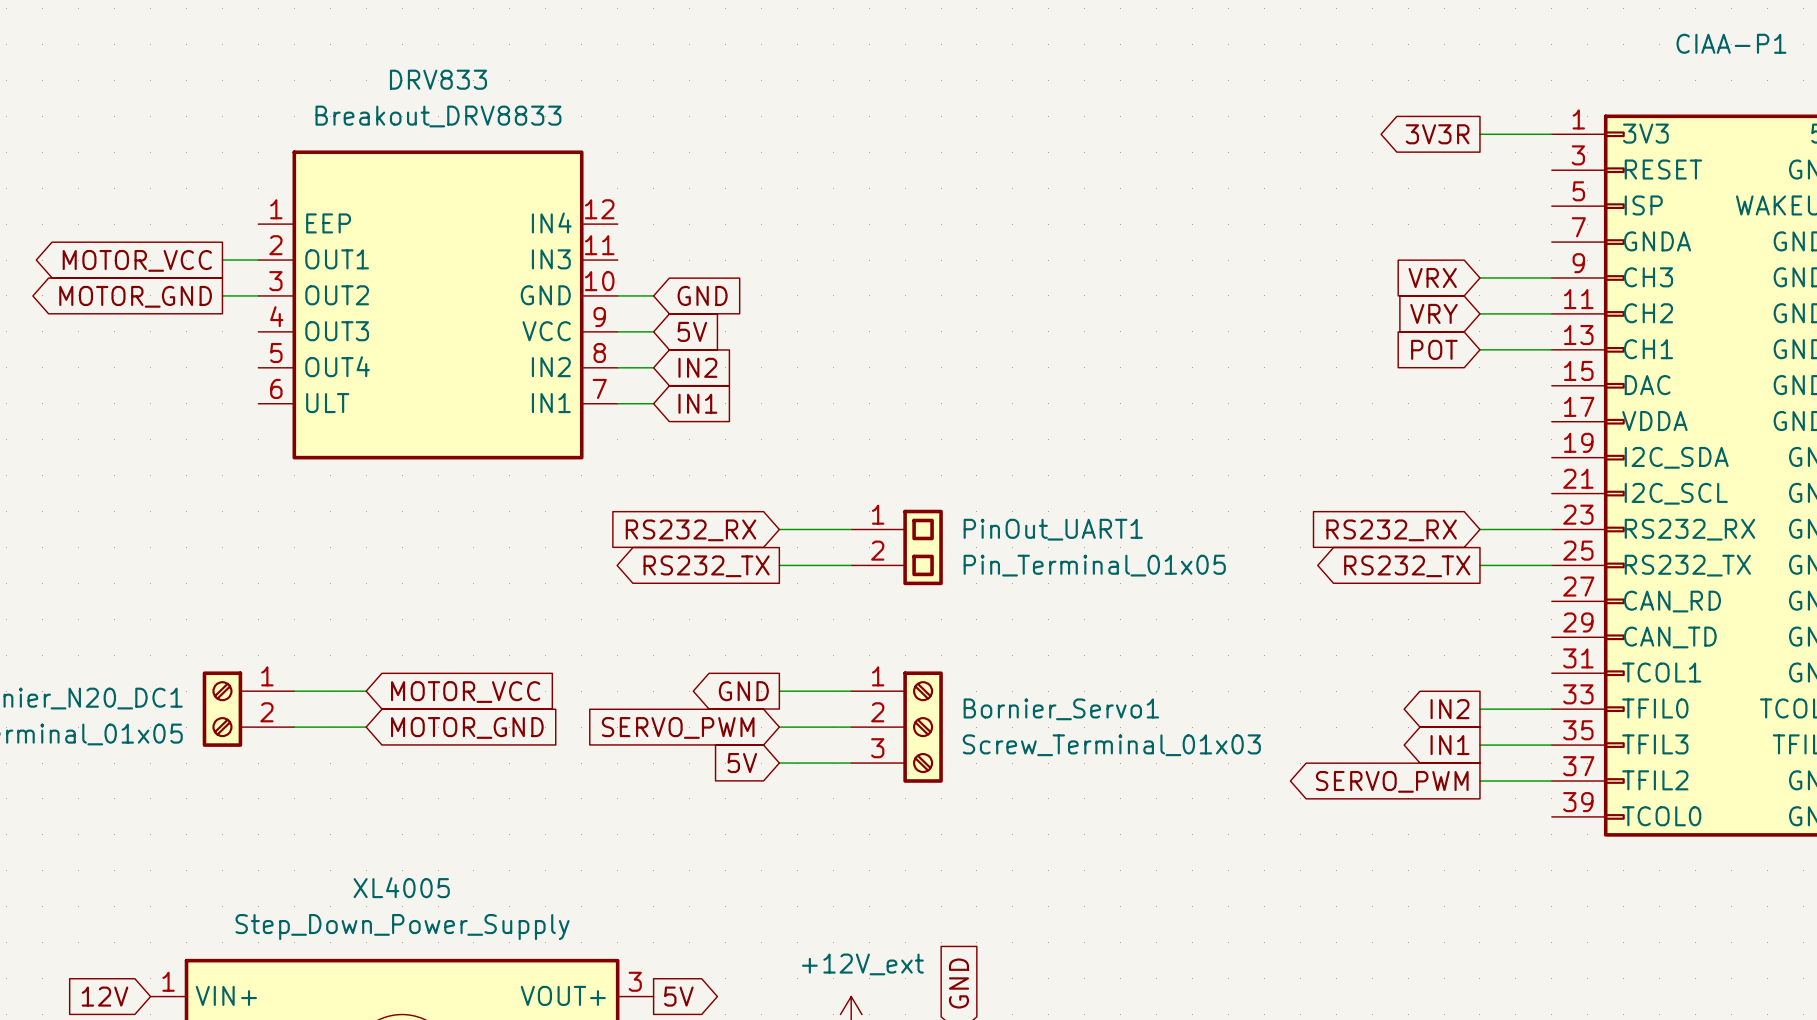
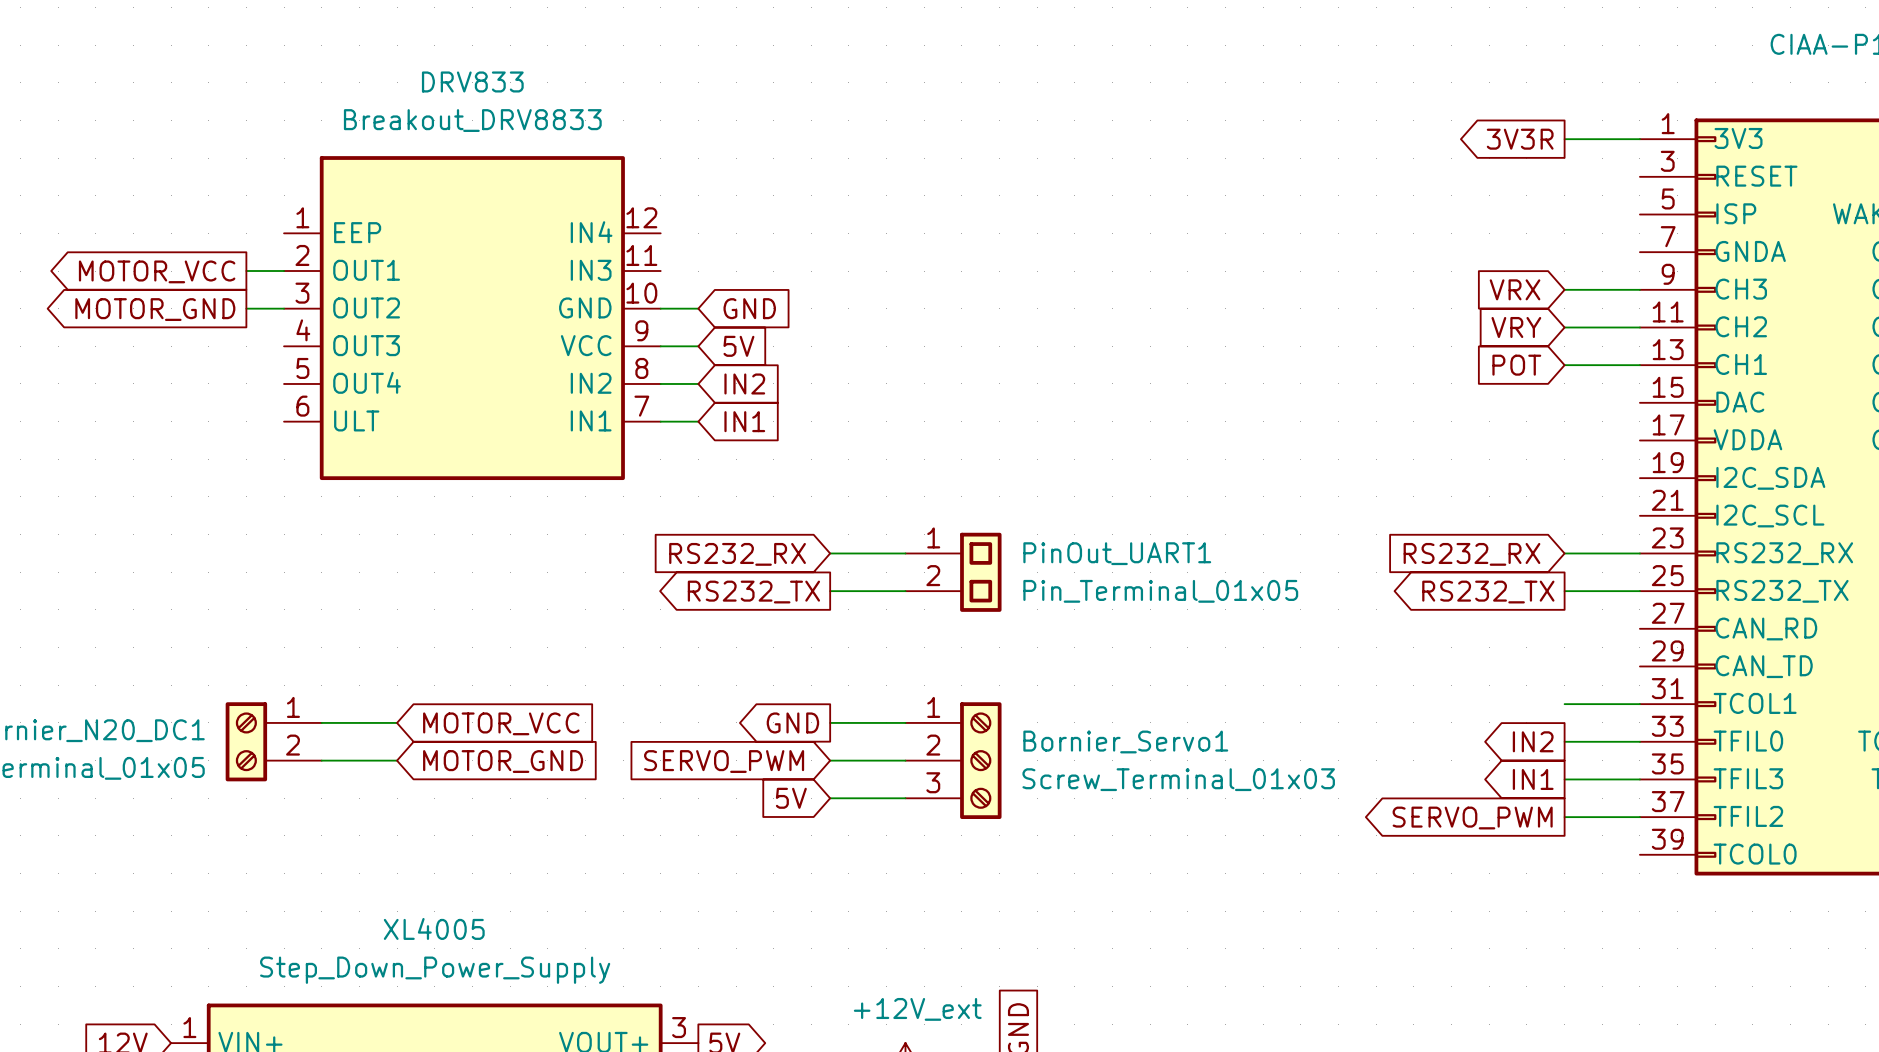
wire: none -> (1564, 704) (1639, 704)

